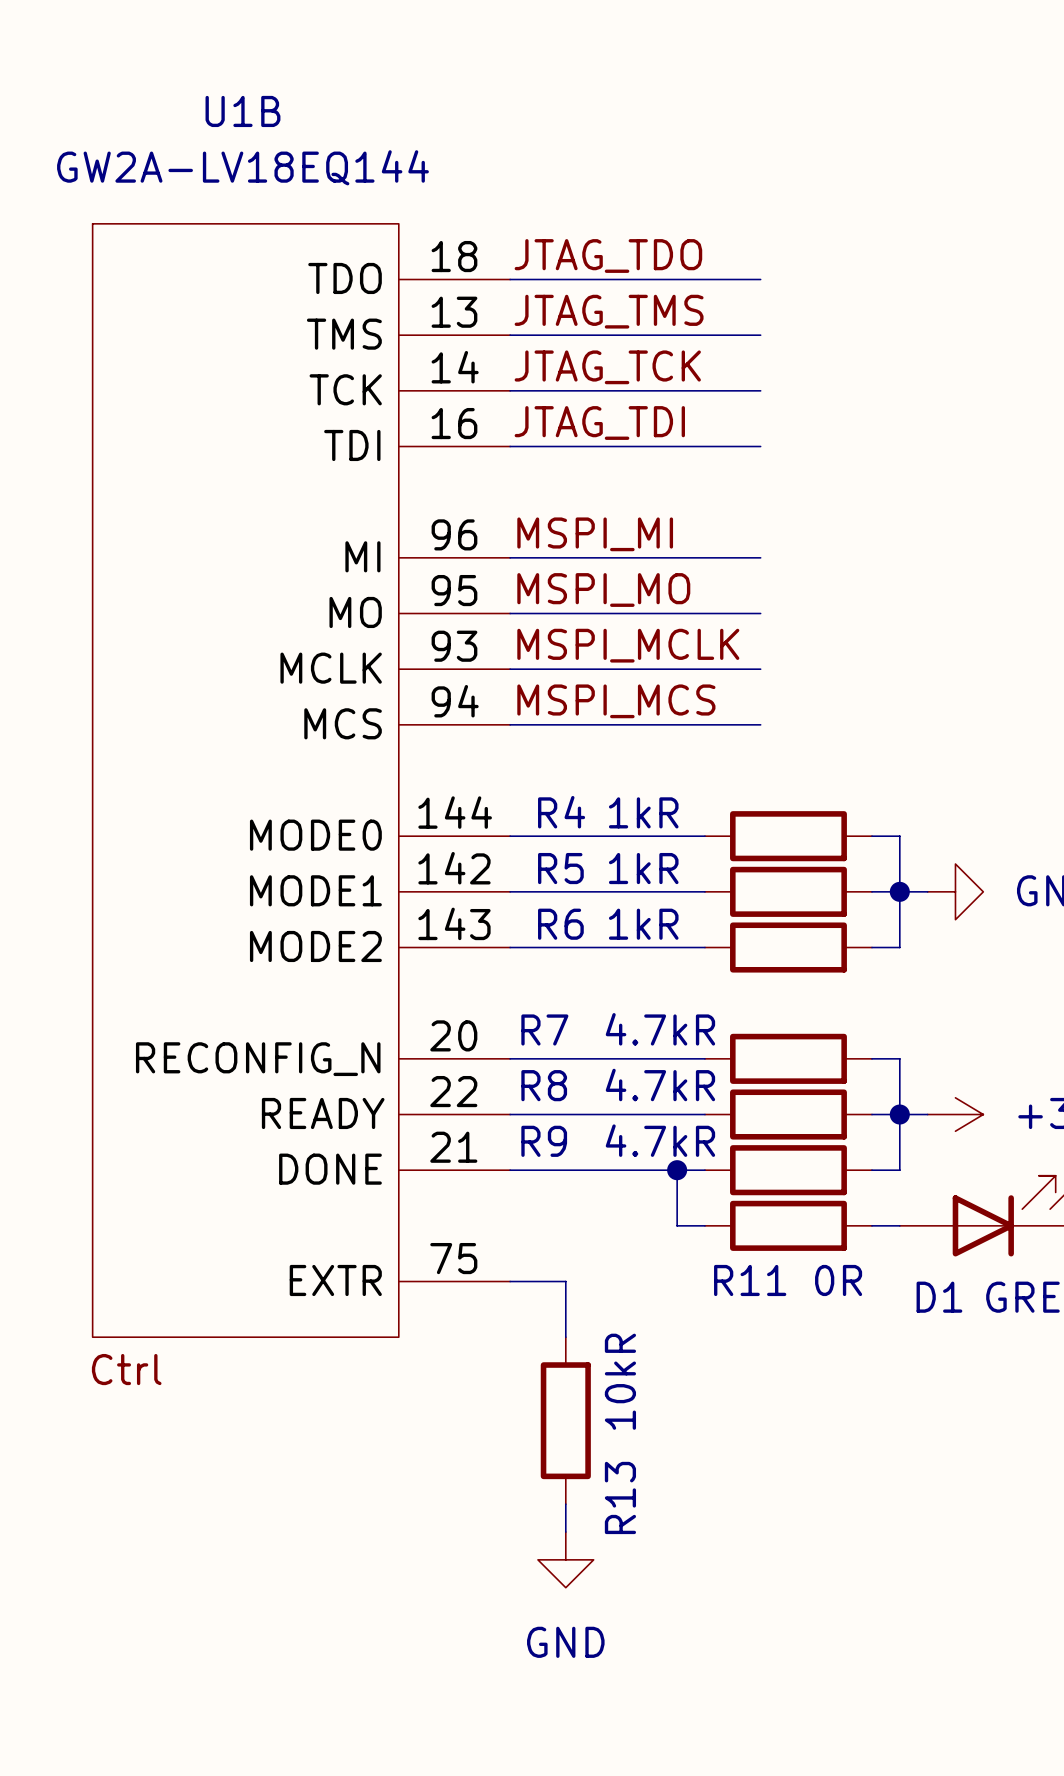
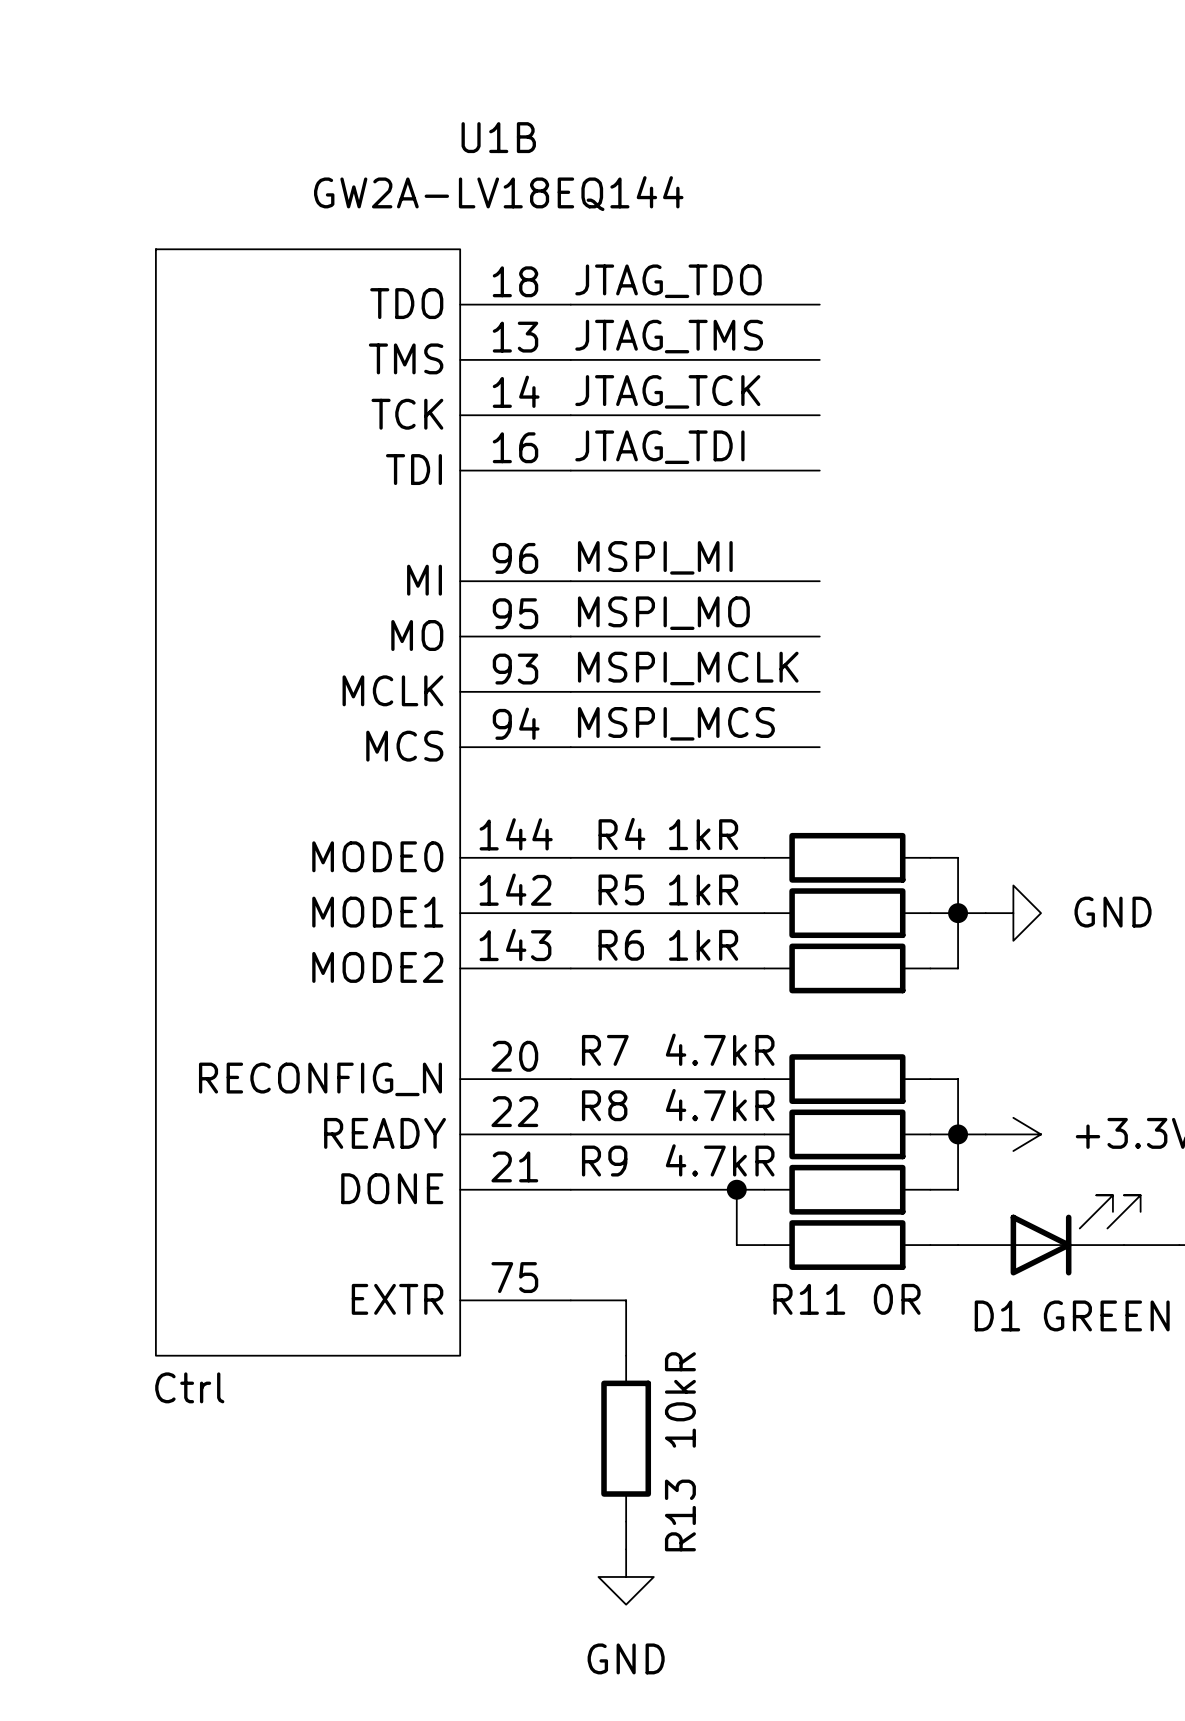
U1B name position: U1B (242, 111) -> U1B (498, 137)
U1B value position: GW2A-LV18EQ144 (242, 167) -> GW2A-LV18EQ144 (498, 193)

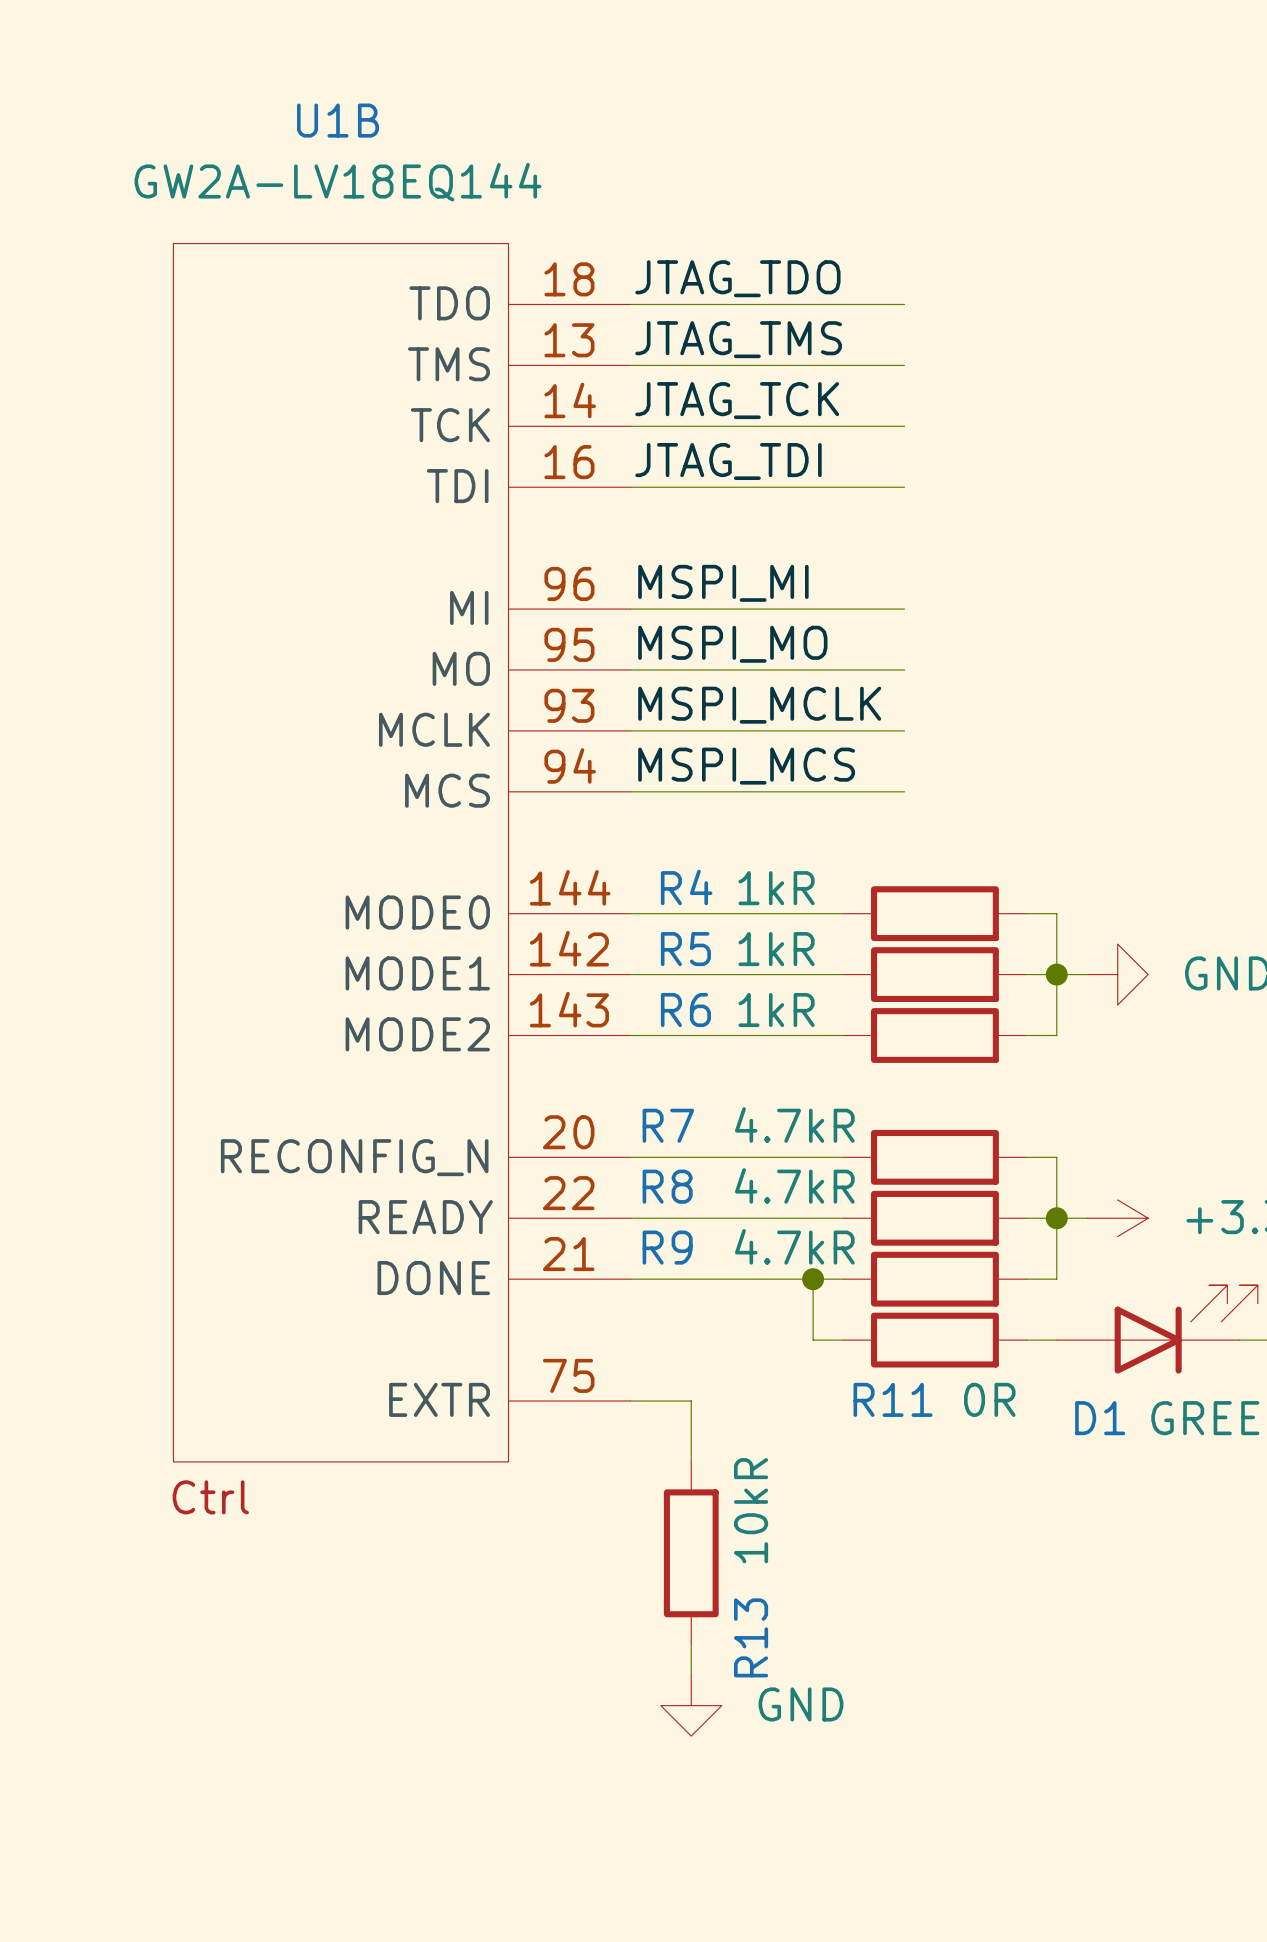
U1B name position: U1B (498, 137) -> U1B (337, 120)
U1B value position: GW2A-LV18EQ144 (498, 193) -> GW2A-LV18EQ144 (337, 182)
power symbol text position: GND (626, 1658) -> GND (801, 1704)

